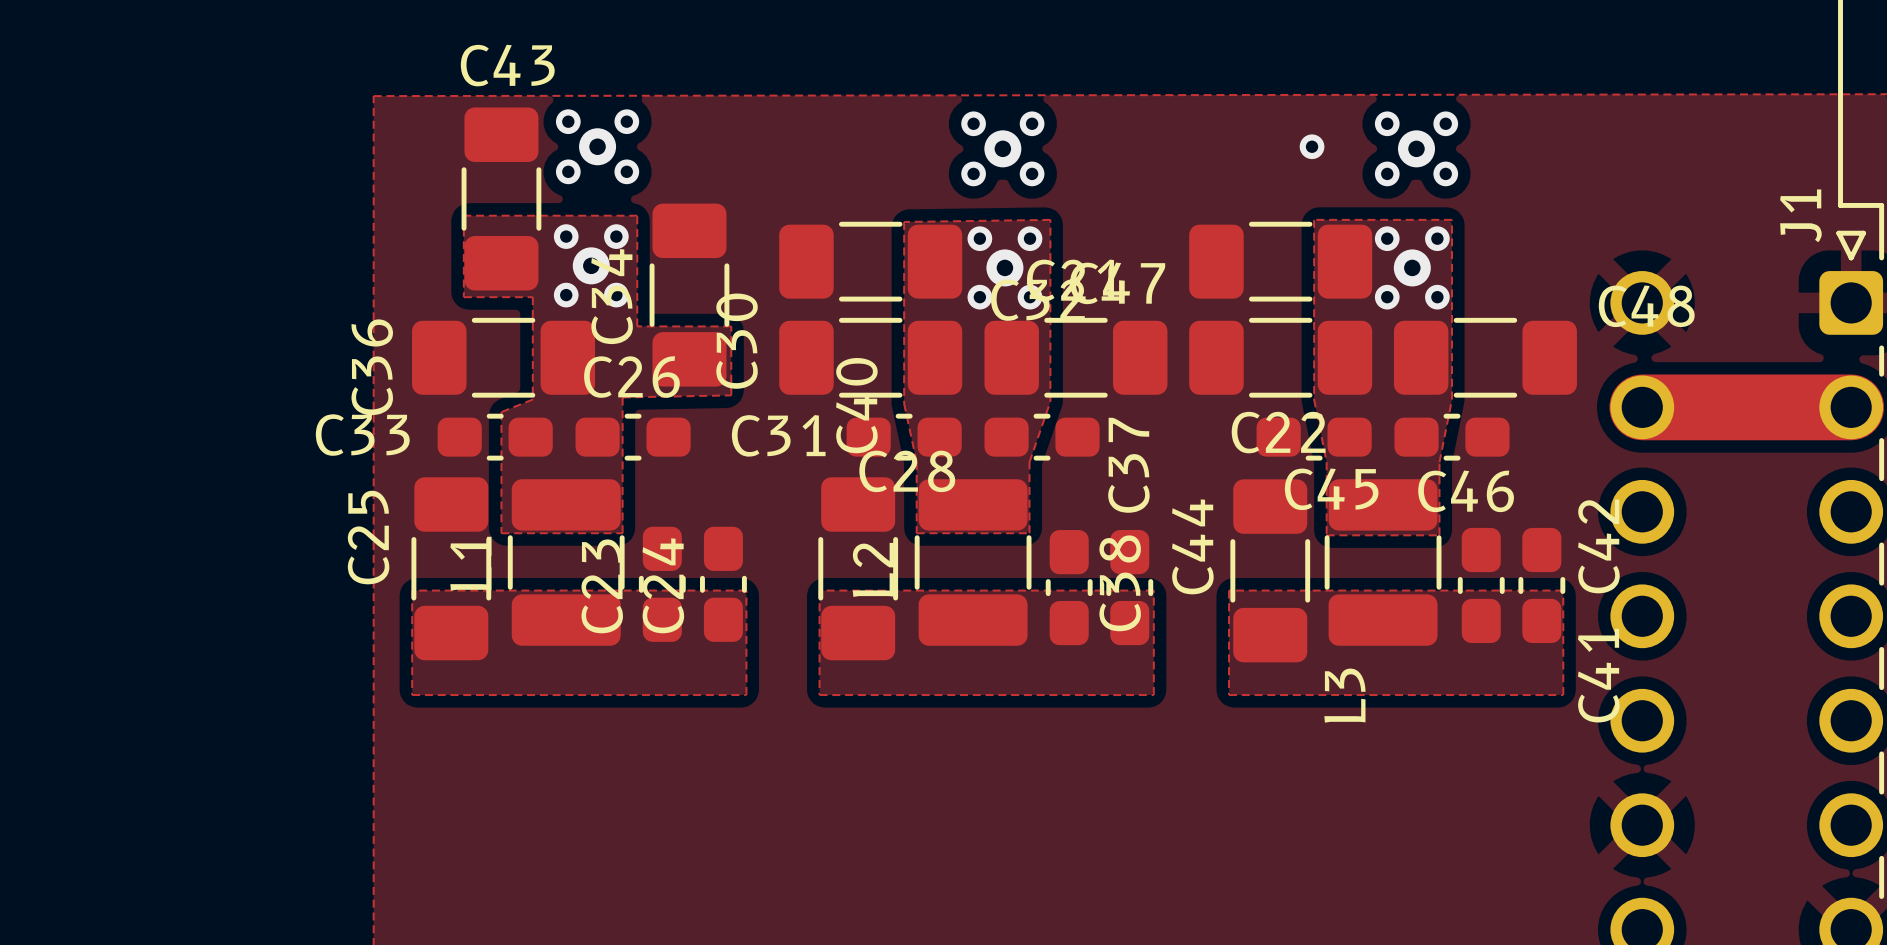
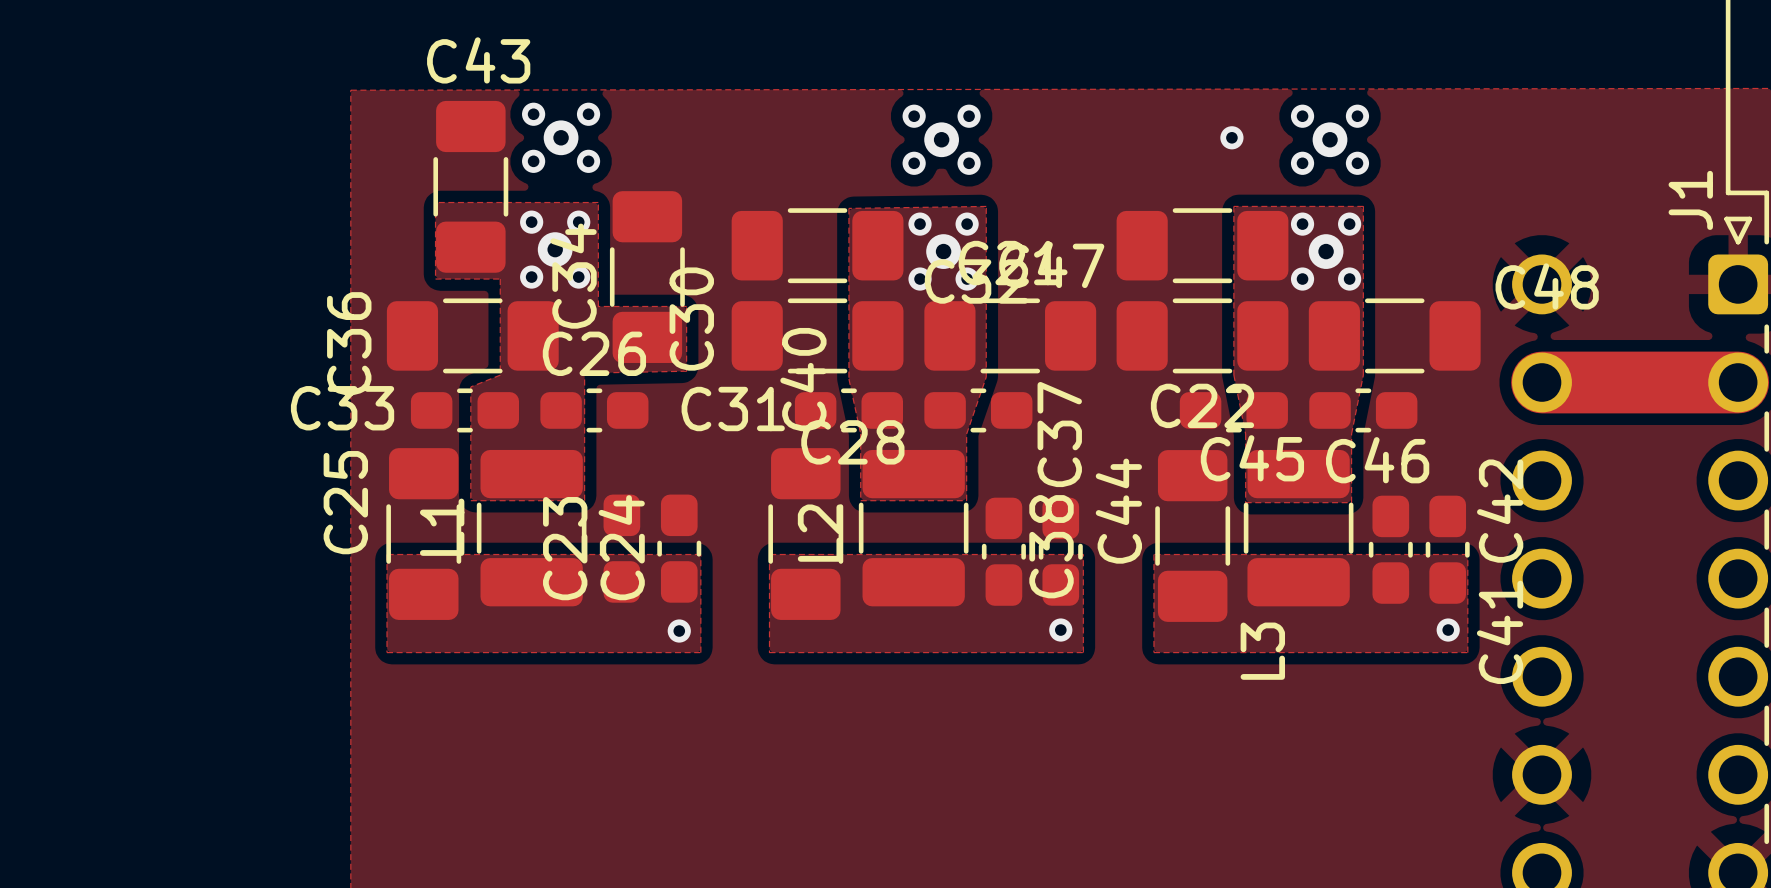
via: none -> (1060, 630)
via: none -> (1448, 630)
via: none -> (679, 631)

